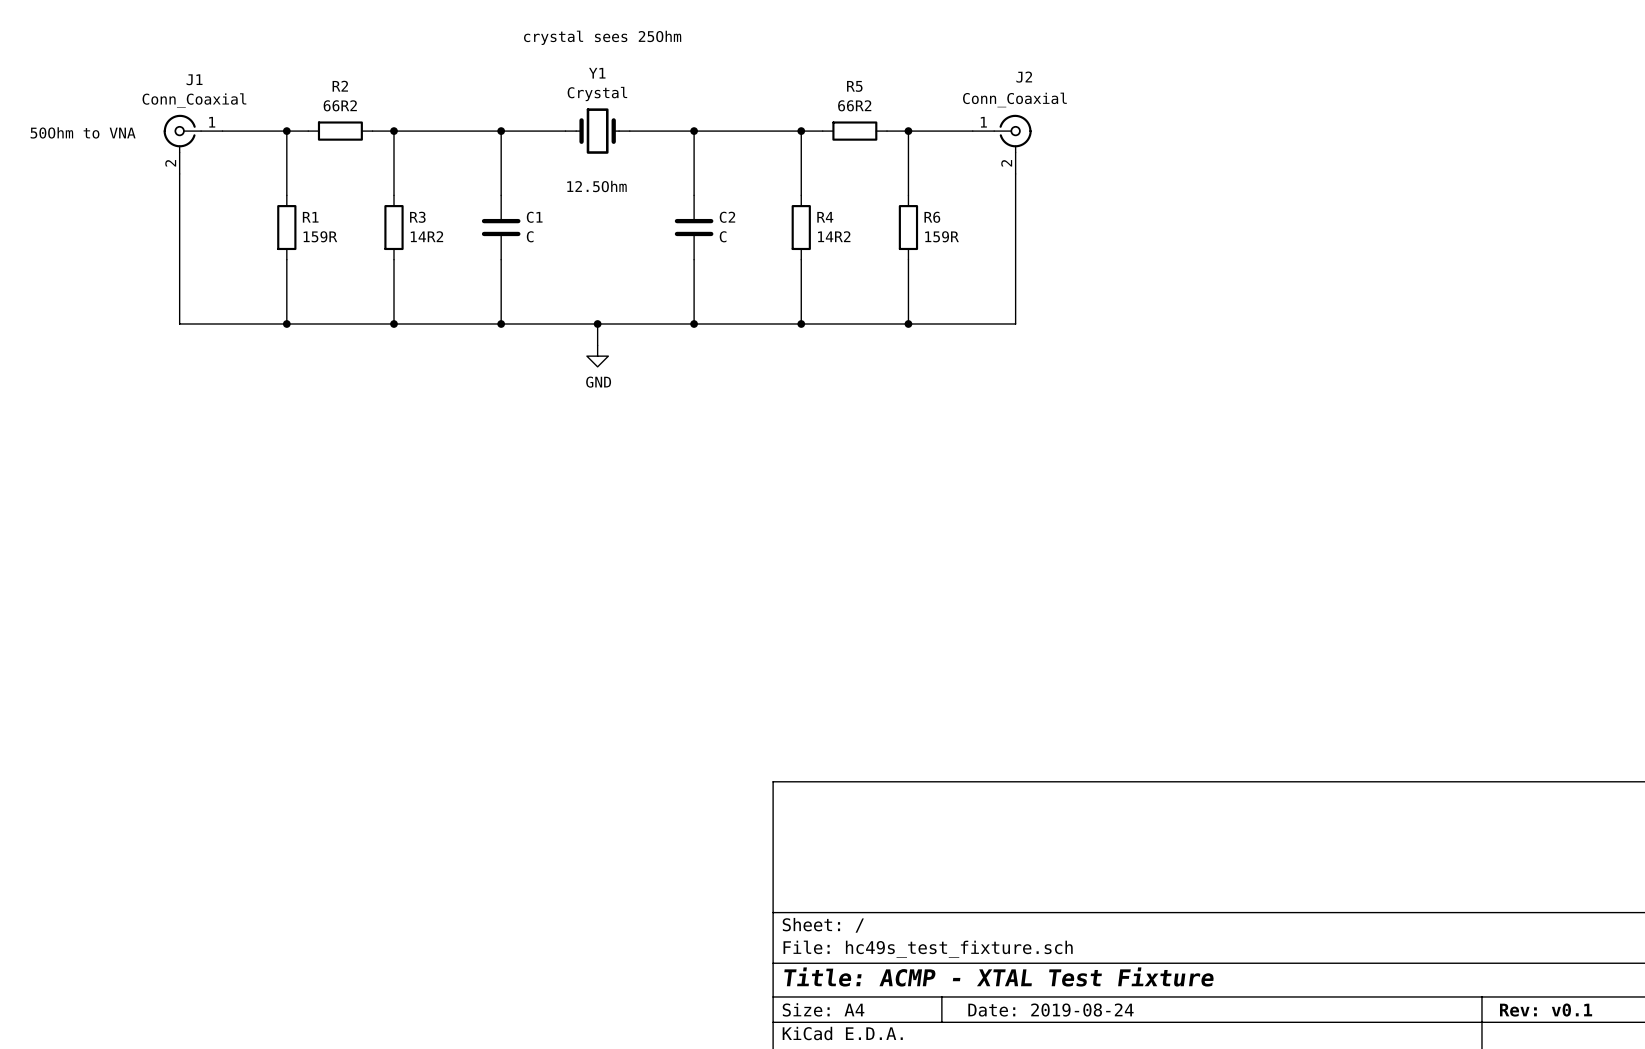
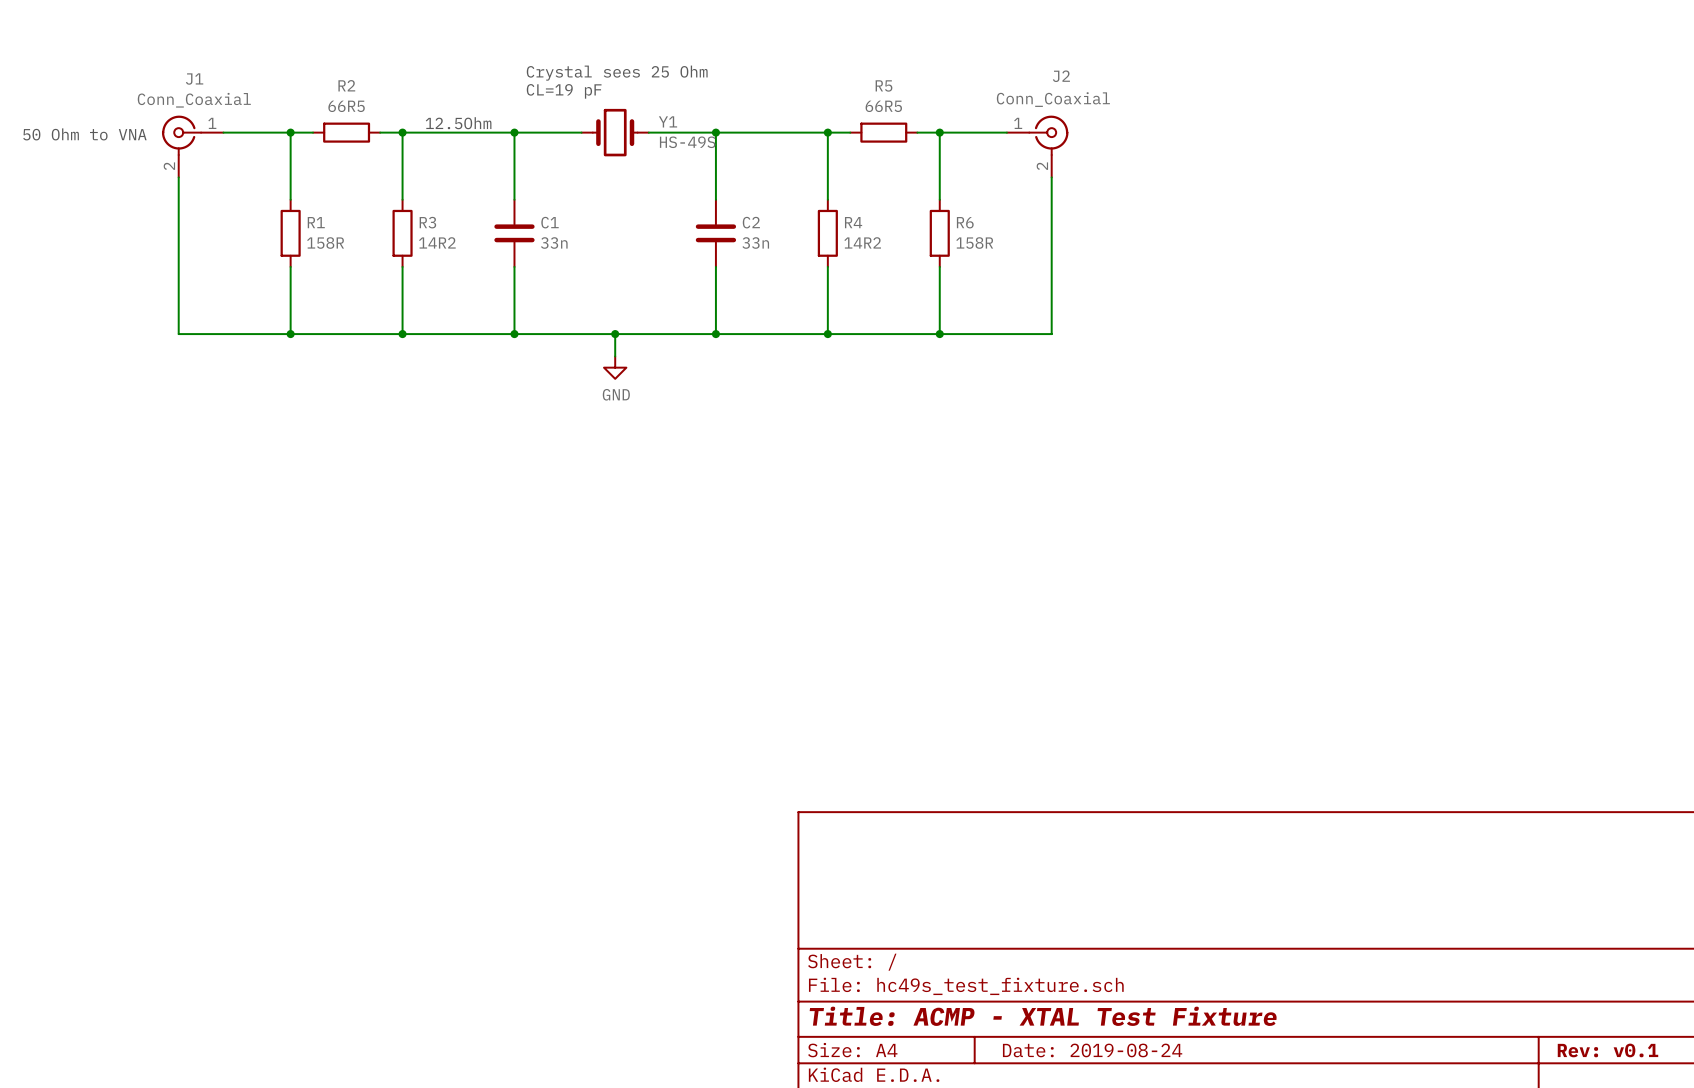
text: crystal sees 25Ohm (602, 37) -> none
Y1 name position: Y1 (597, 73) -> Y1 (668, 121)
text: none -> Crystal sees 25 Ohm (617, 73)
text: none -> CL=19 pF (564, 91)
Y1 value: Crystal (597, 94) -> HS-49S (687, 142)
R2 value: 66R2 (340, 105) -> 66R5 (346, 106)
R5 value: 66R2 (854, 105) -> 66R5 (883, 106)
text: 50Ohm to VNA (83, 132) -> 50 Ohm to VNA (84, 134)
text position: 12.5Ohm (596, 186) -> 12.5Ohm (458, 123)
R1 value: 159R (320, 236) -> 158R (325, 243)
C1 value: C (530, 236) -> 33n (554, 243)
C2 value: C (723, 236) -> 33n (755, 243)
R6 value: 159R (942, 236) -> 158R (974, 243)

